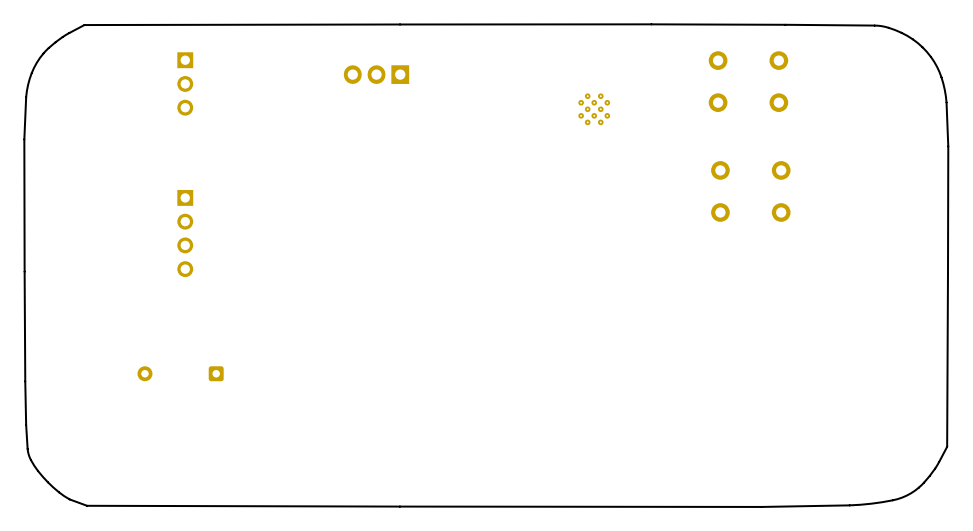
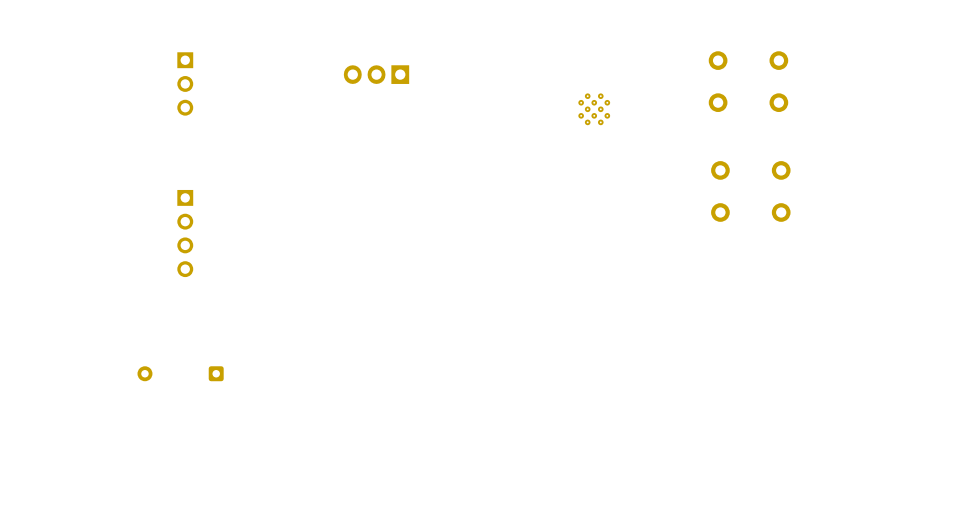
board edge: (651, 24) (881, 26) (895, 30) (912, 39) (926, 51) (937, 66) (945, 96) (948, 146) (947, 446) (935, 468) (915, 490) (892, 500) (849, 505) (761, 506) (87, 505) (64, 496) (38, 471) (28, 454) (26, 424) (24, 139) (26, 96) (29, 78) (36, 62) (46, 50) (62, 36) (84, 25) (651, 24) -> none

